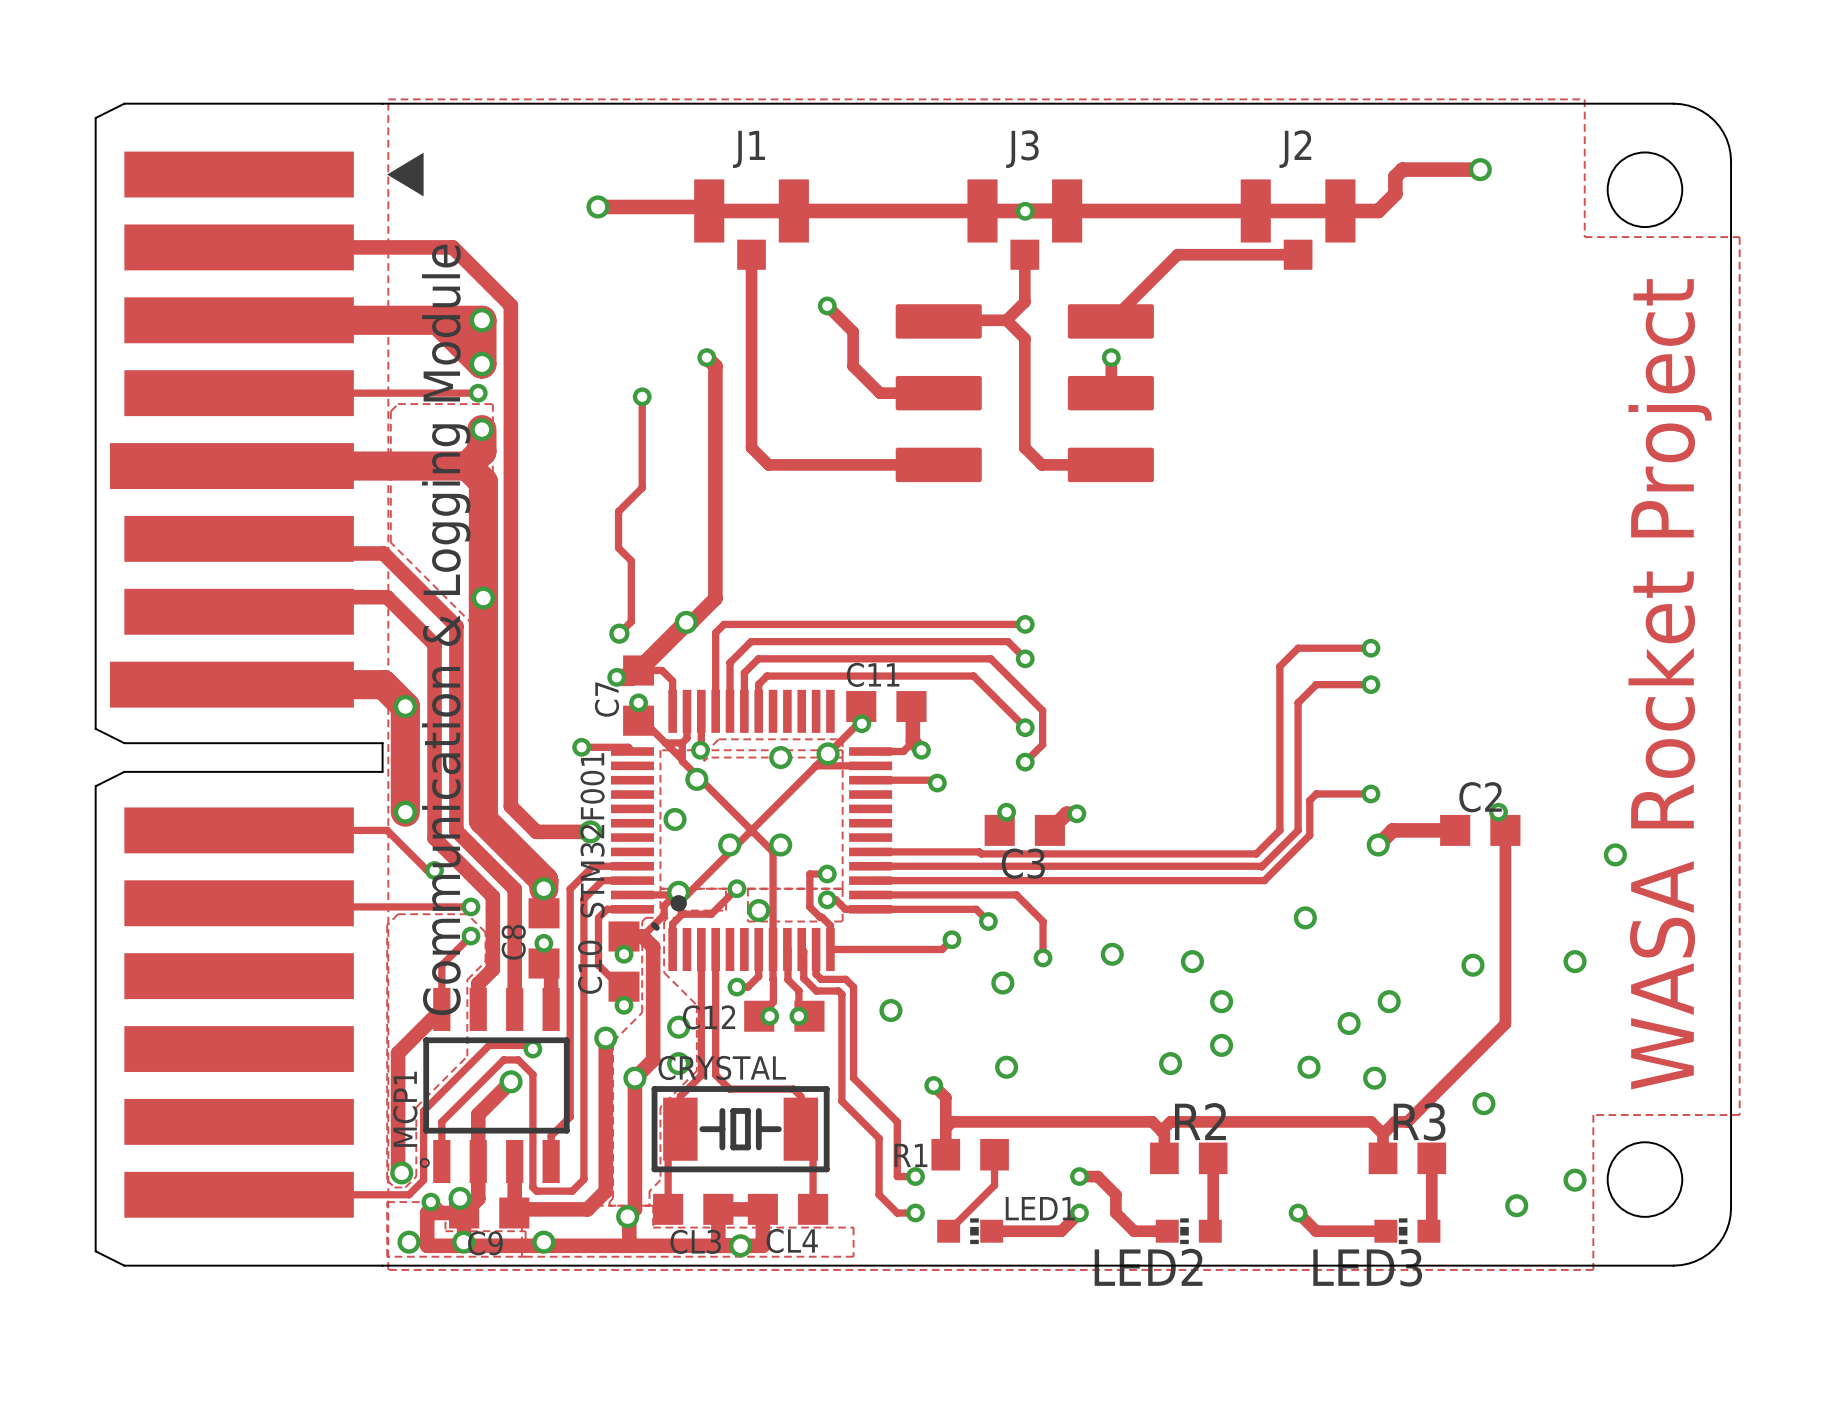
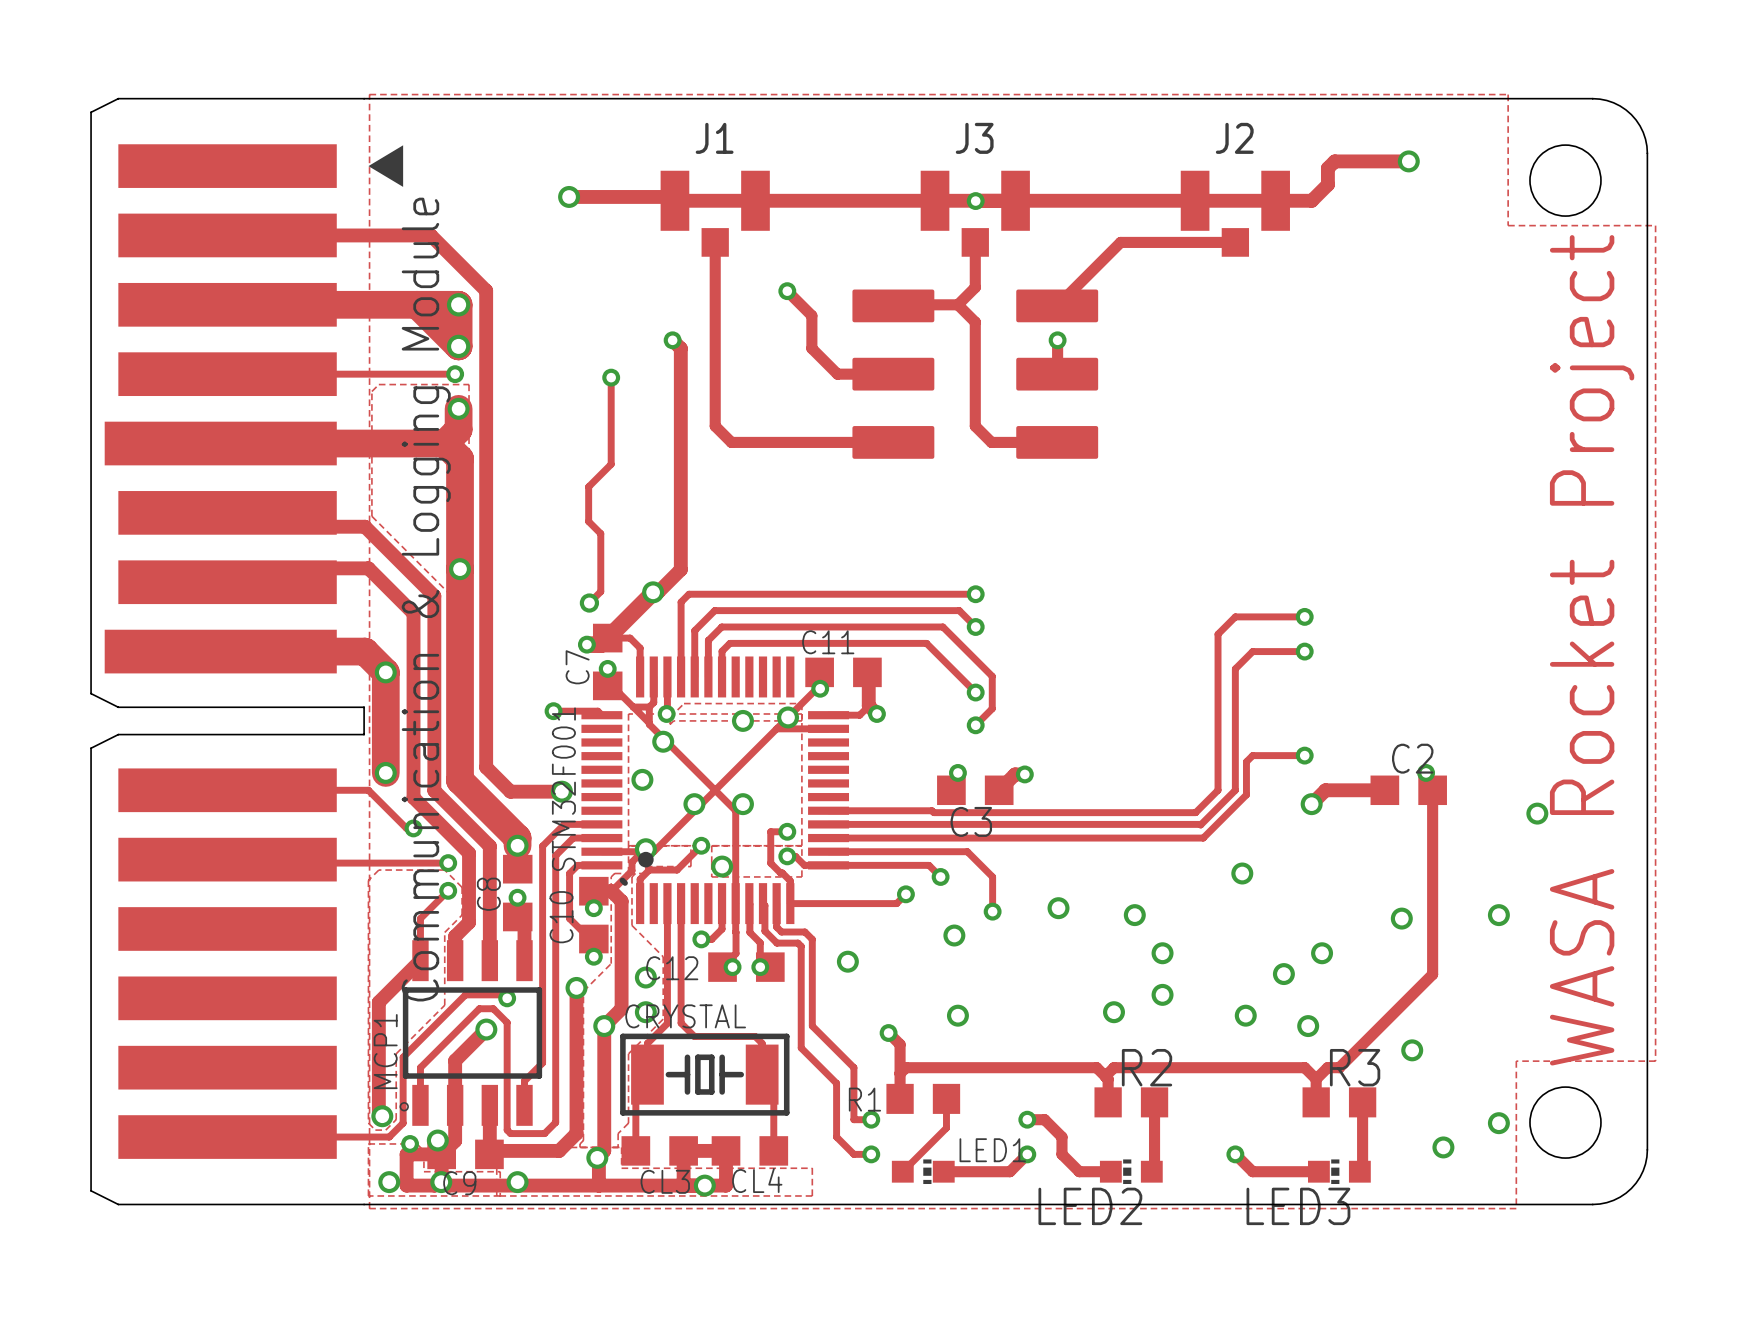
track: (870, 780) (934, 780) (937, 783) -> none
via: (937, 783) -> none

